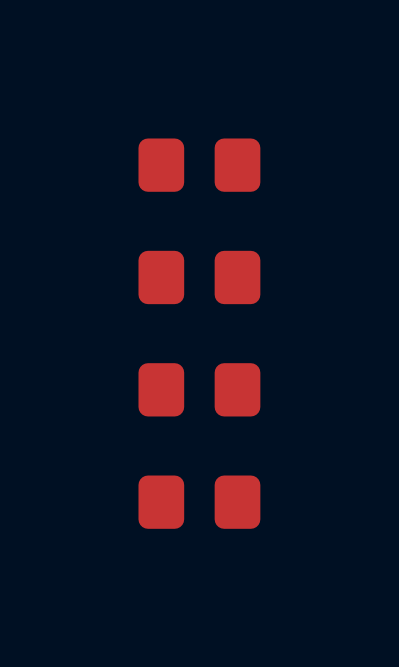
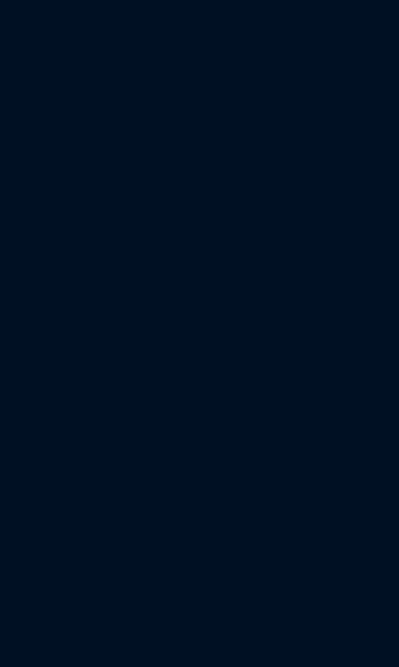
part: (199, 165) -> none
part: (199, 277) -> none
part: (199, 389) -> none
part: (199, 502) -> none

